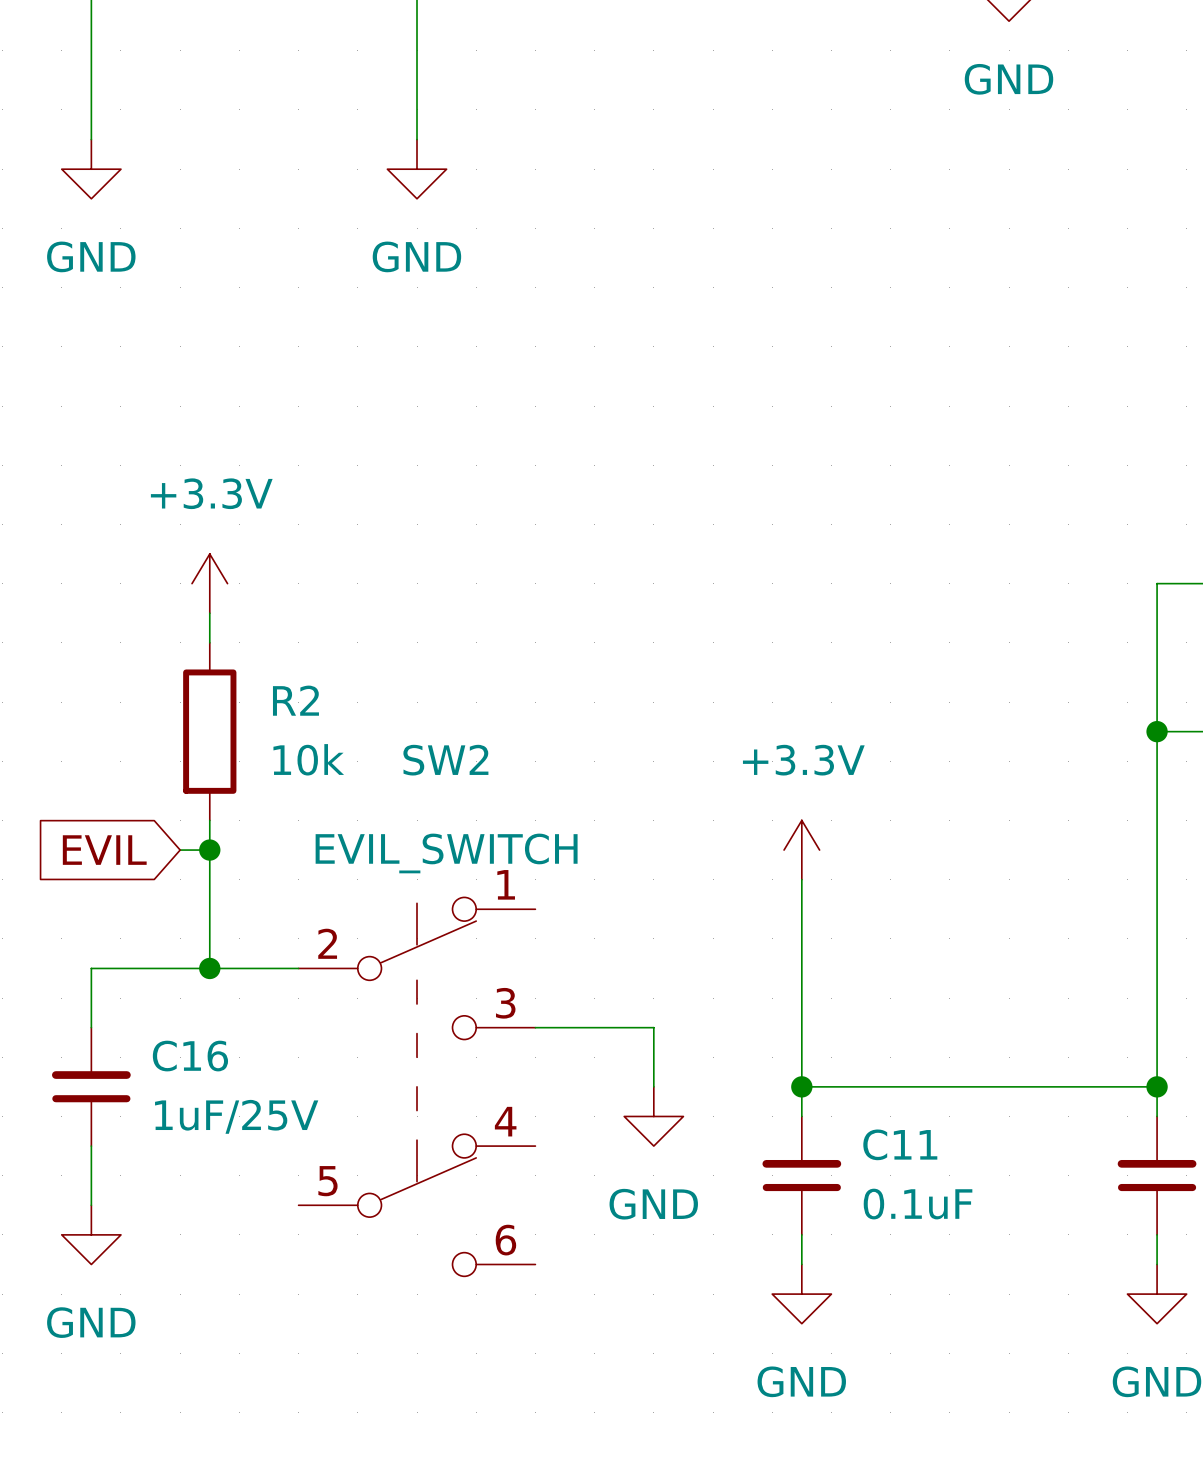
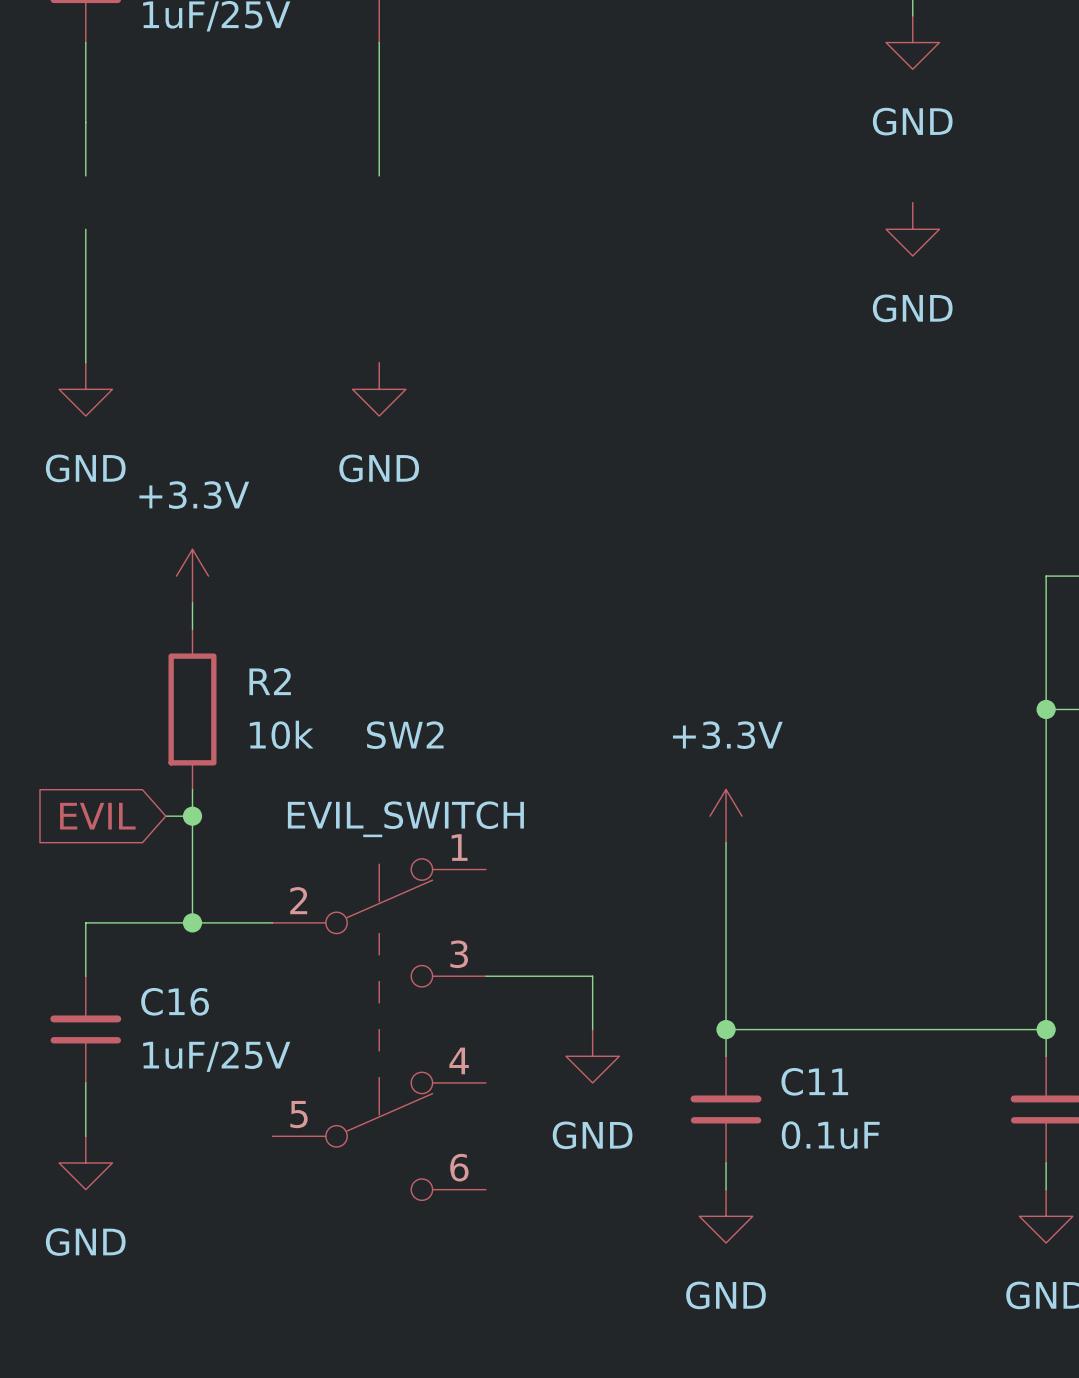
power symbol: GND (91, 169) -> none
power symbol: GND (417, 169) -> none
wire: none -> (85, 229) (85, 362)
power symbol: none -> GND (912, 229)
power symbol: none -> GND (85, 389)
power symbol: none -> GND (379, 389)

